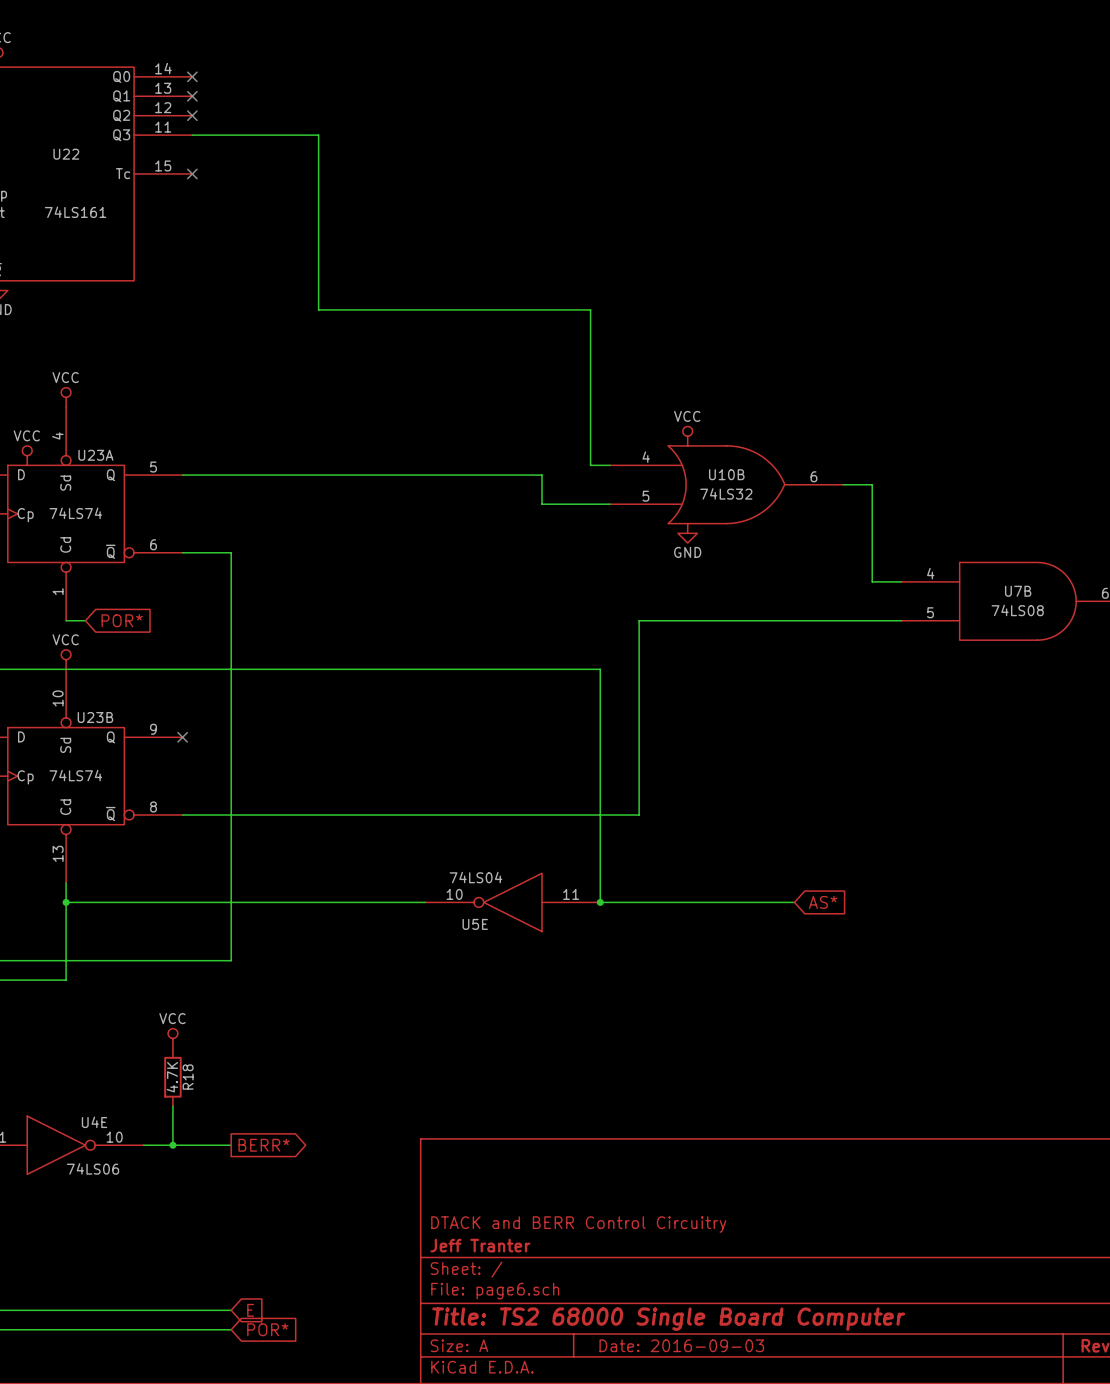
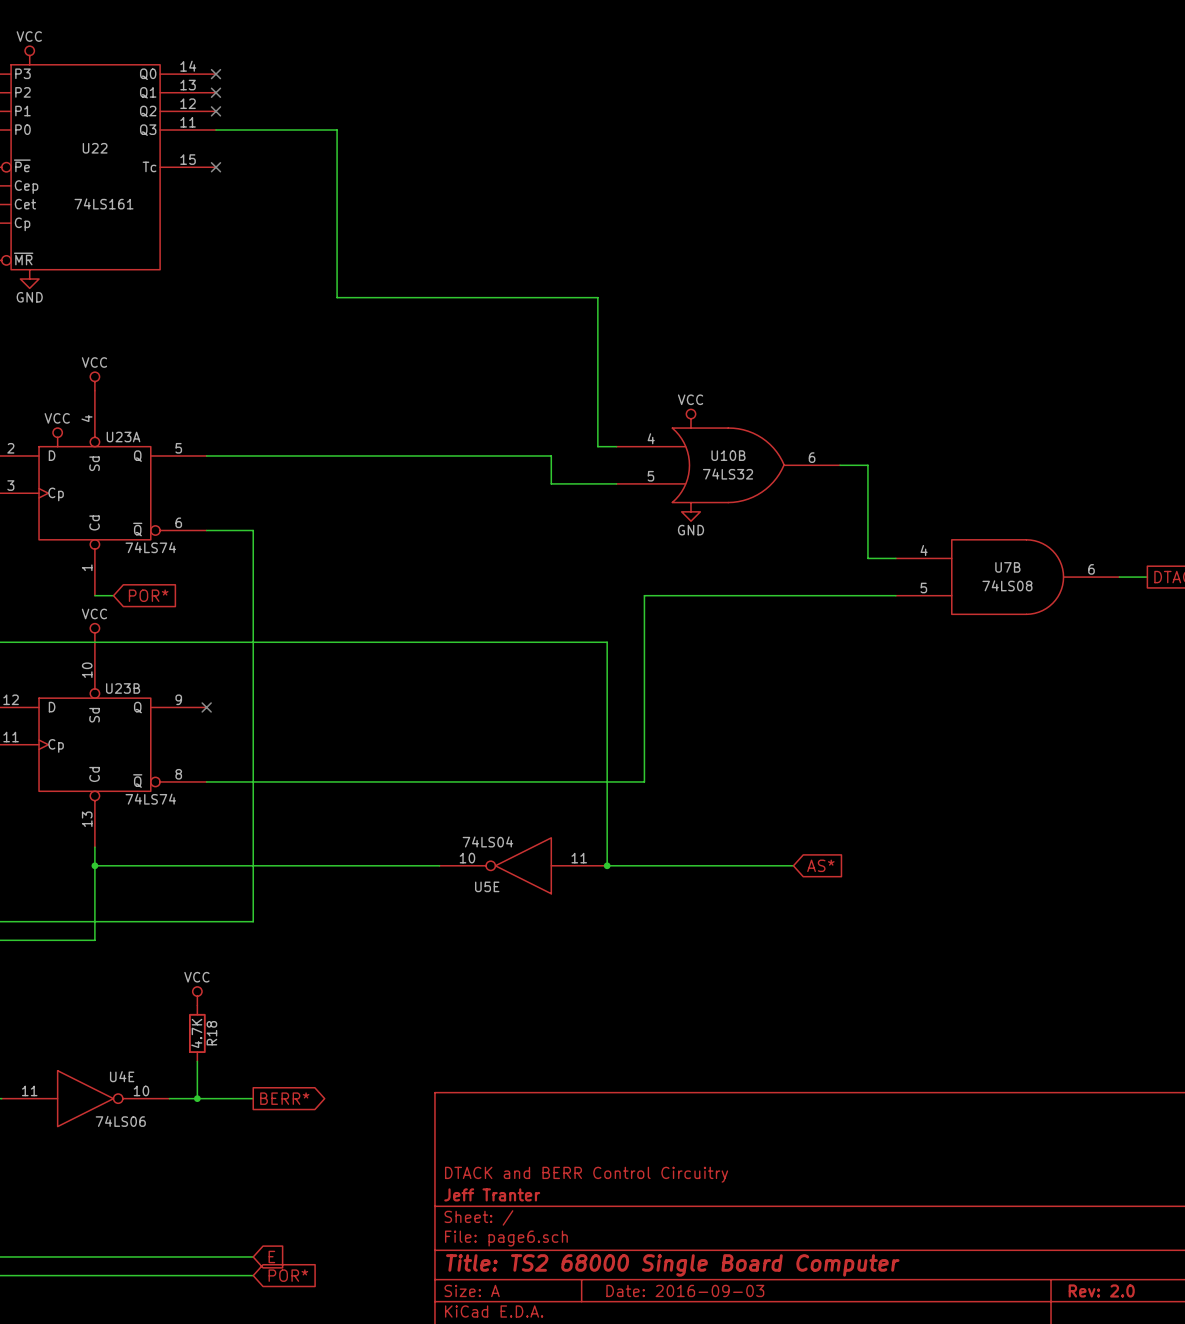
U23A value position: 74LS74 (75, 513) -> 74LS74 (150, 547)
U23B value position: 74LS74 (75, 775) -> 74LS74 (150, 799)

